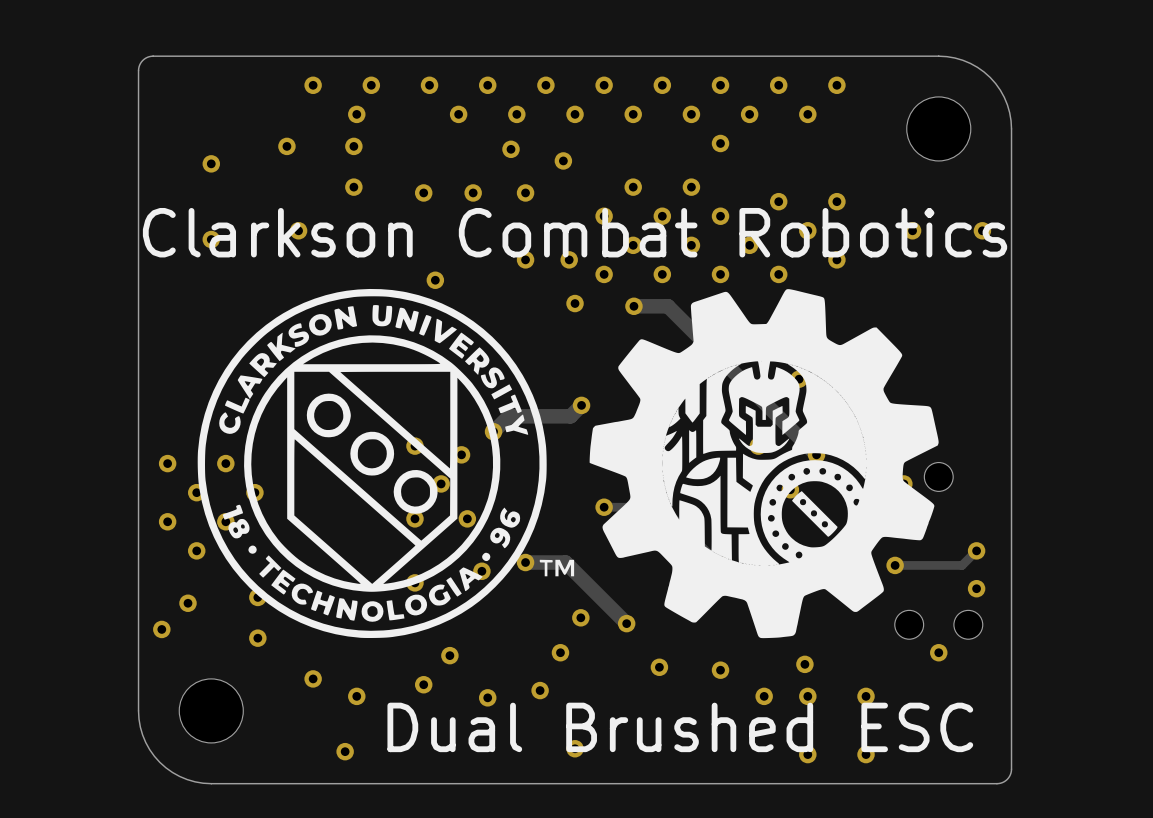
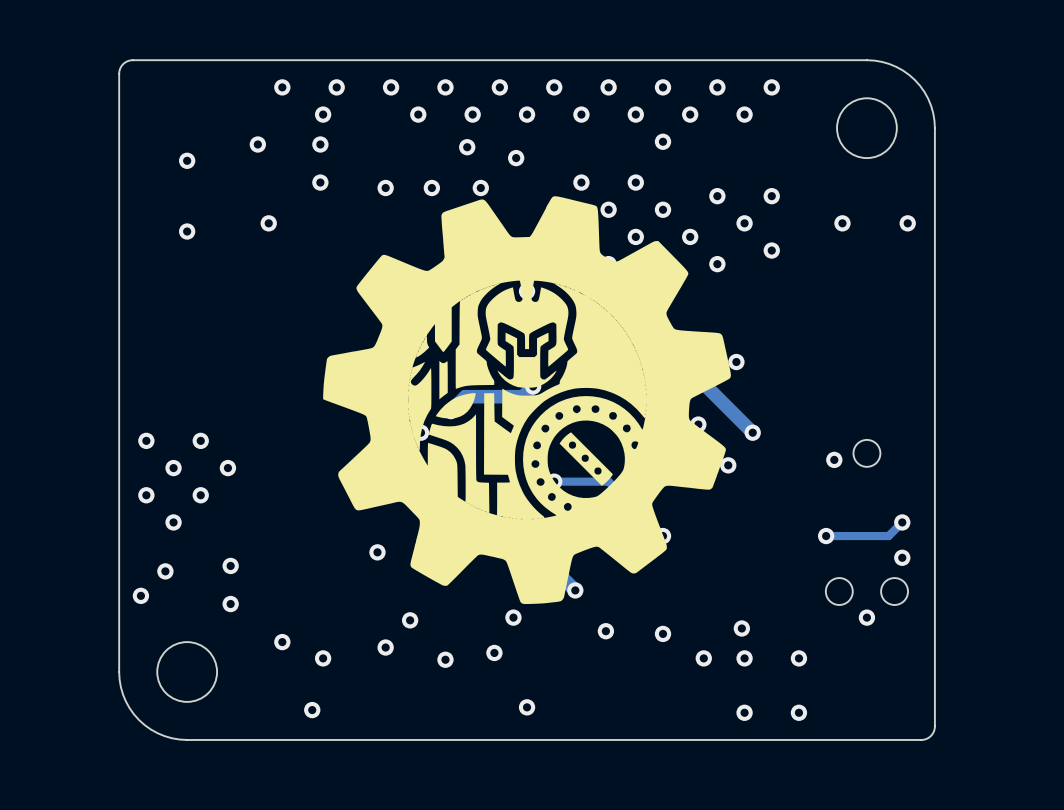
drawing: none -> [323, 196, 731, 605]
text: Clarkson Combat Robotics (575, 232) -> none
drawing: [197, 288, 939, 639] -> none
text: Dual Brushed ESC (680, 727) -> none

